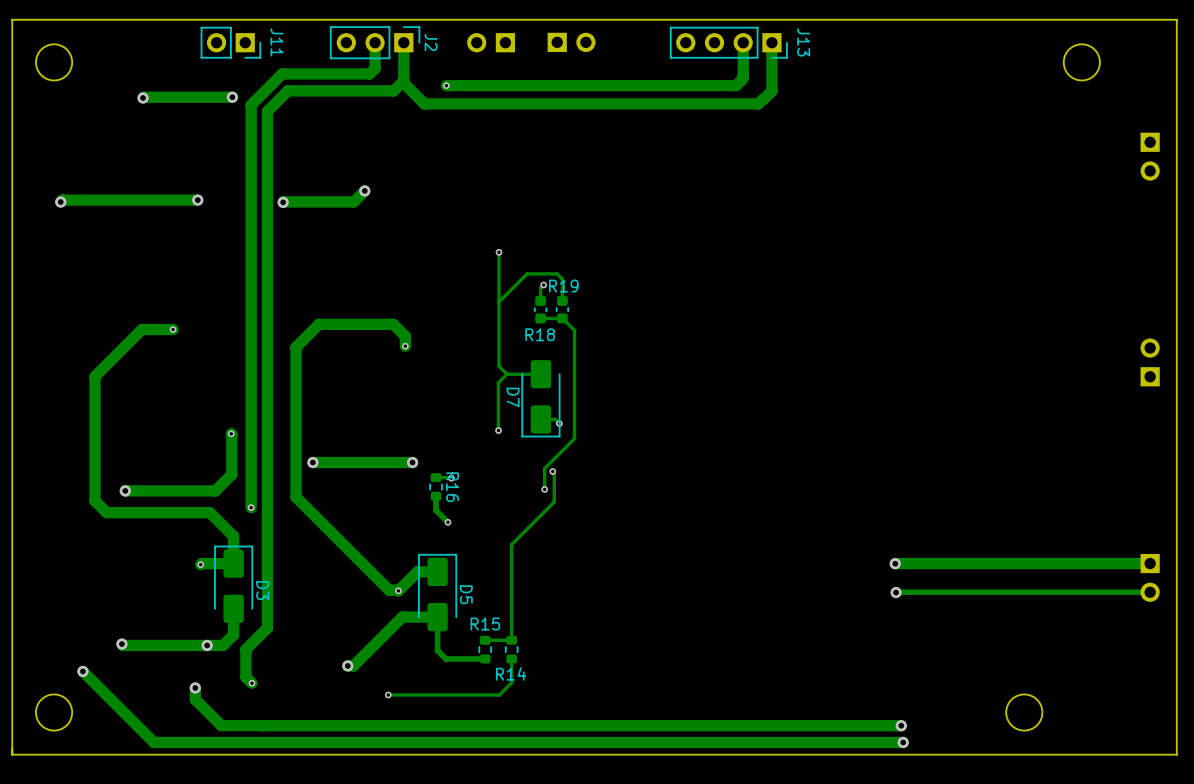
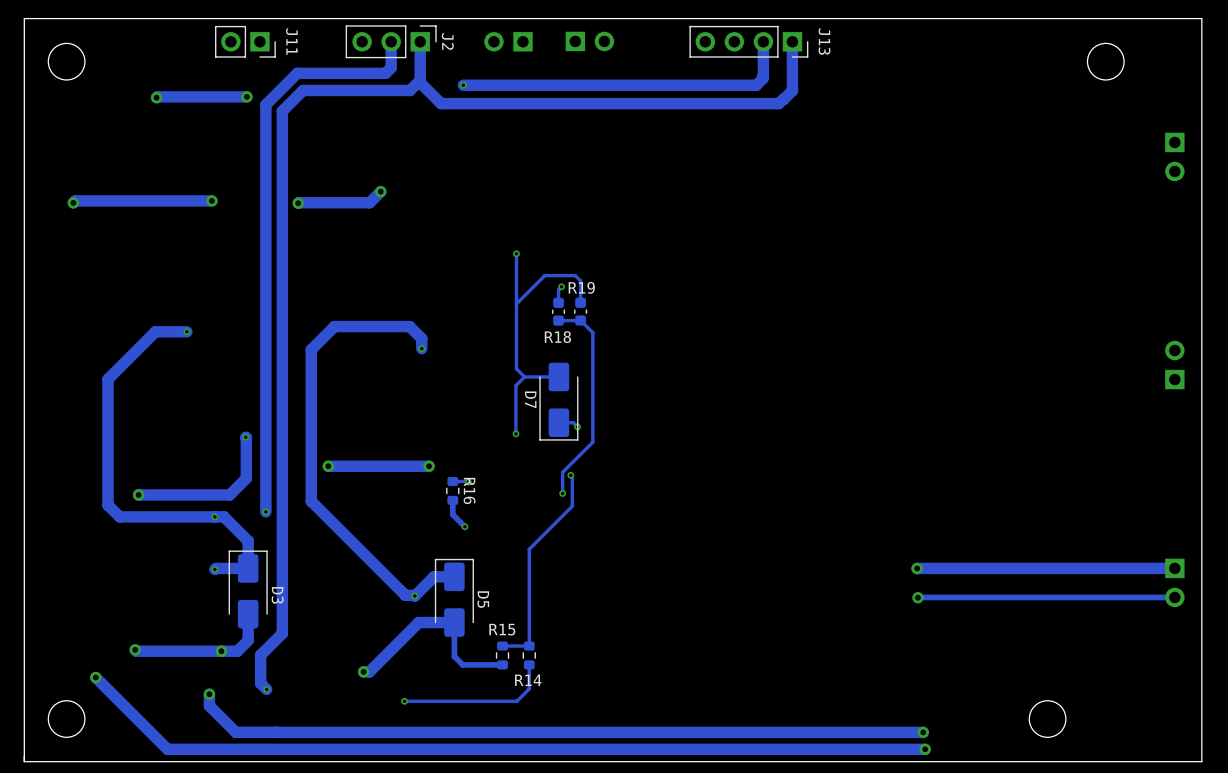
via: none -> (214, 516)

